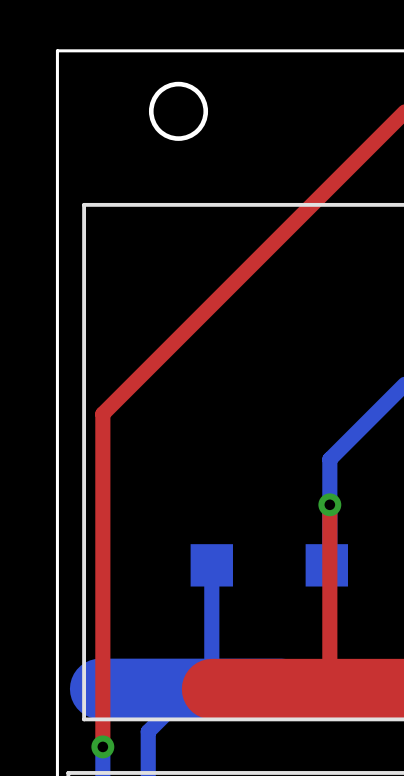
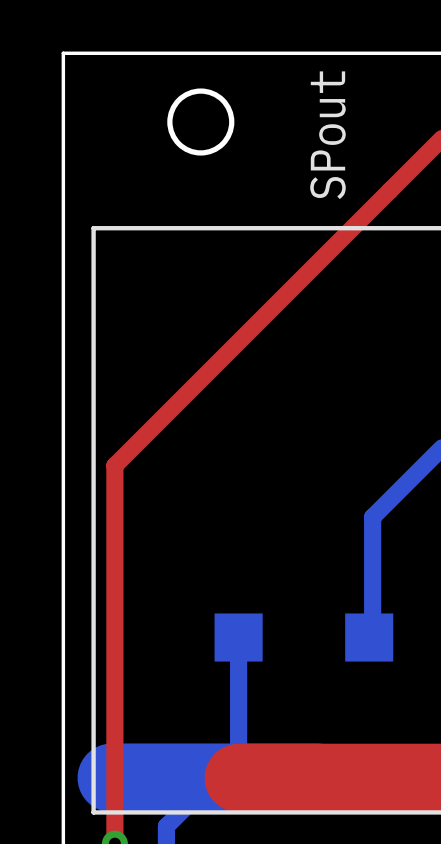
text: none -> SPout (327, 135)
top track: (329, 504) (329, 685) (333, 689) -> none
via: (329, 504) -> none

